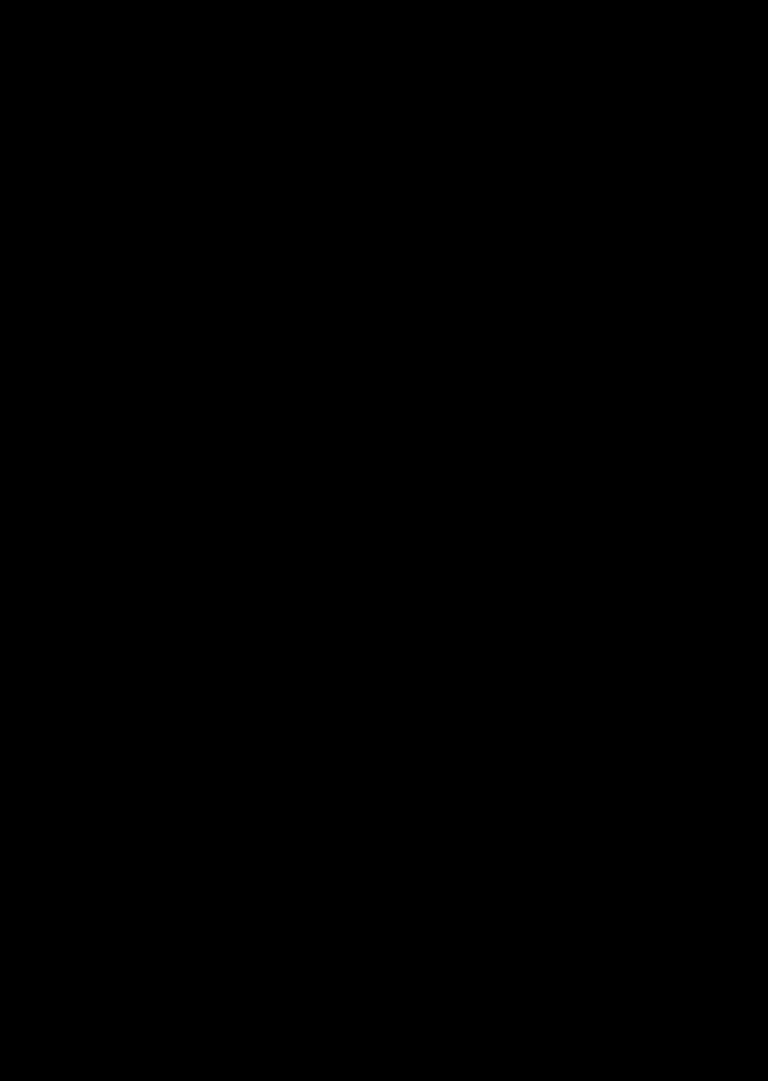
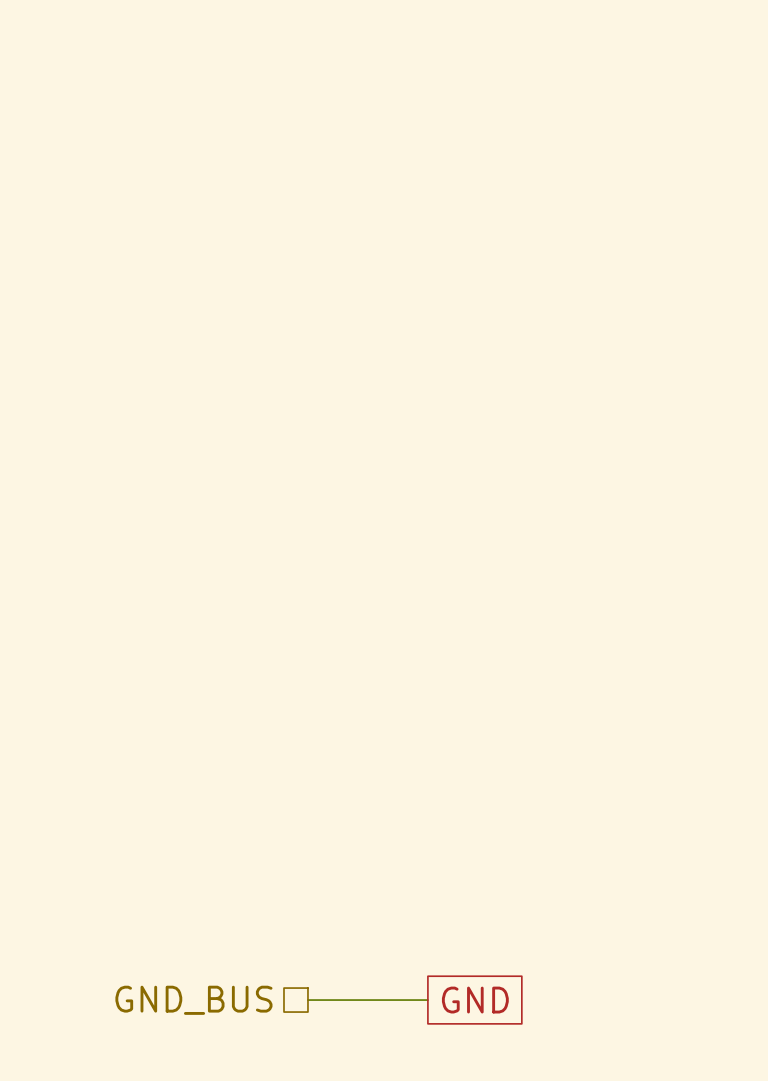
hierarchical label: none -> GND_BUS (193, 1000)
wire: none -> (307, 1000) (427, 1000)
global label: none -> GND (475, 1000)

